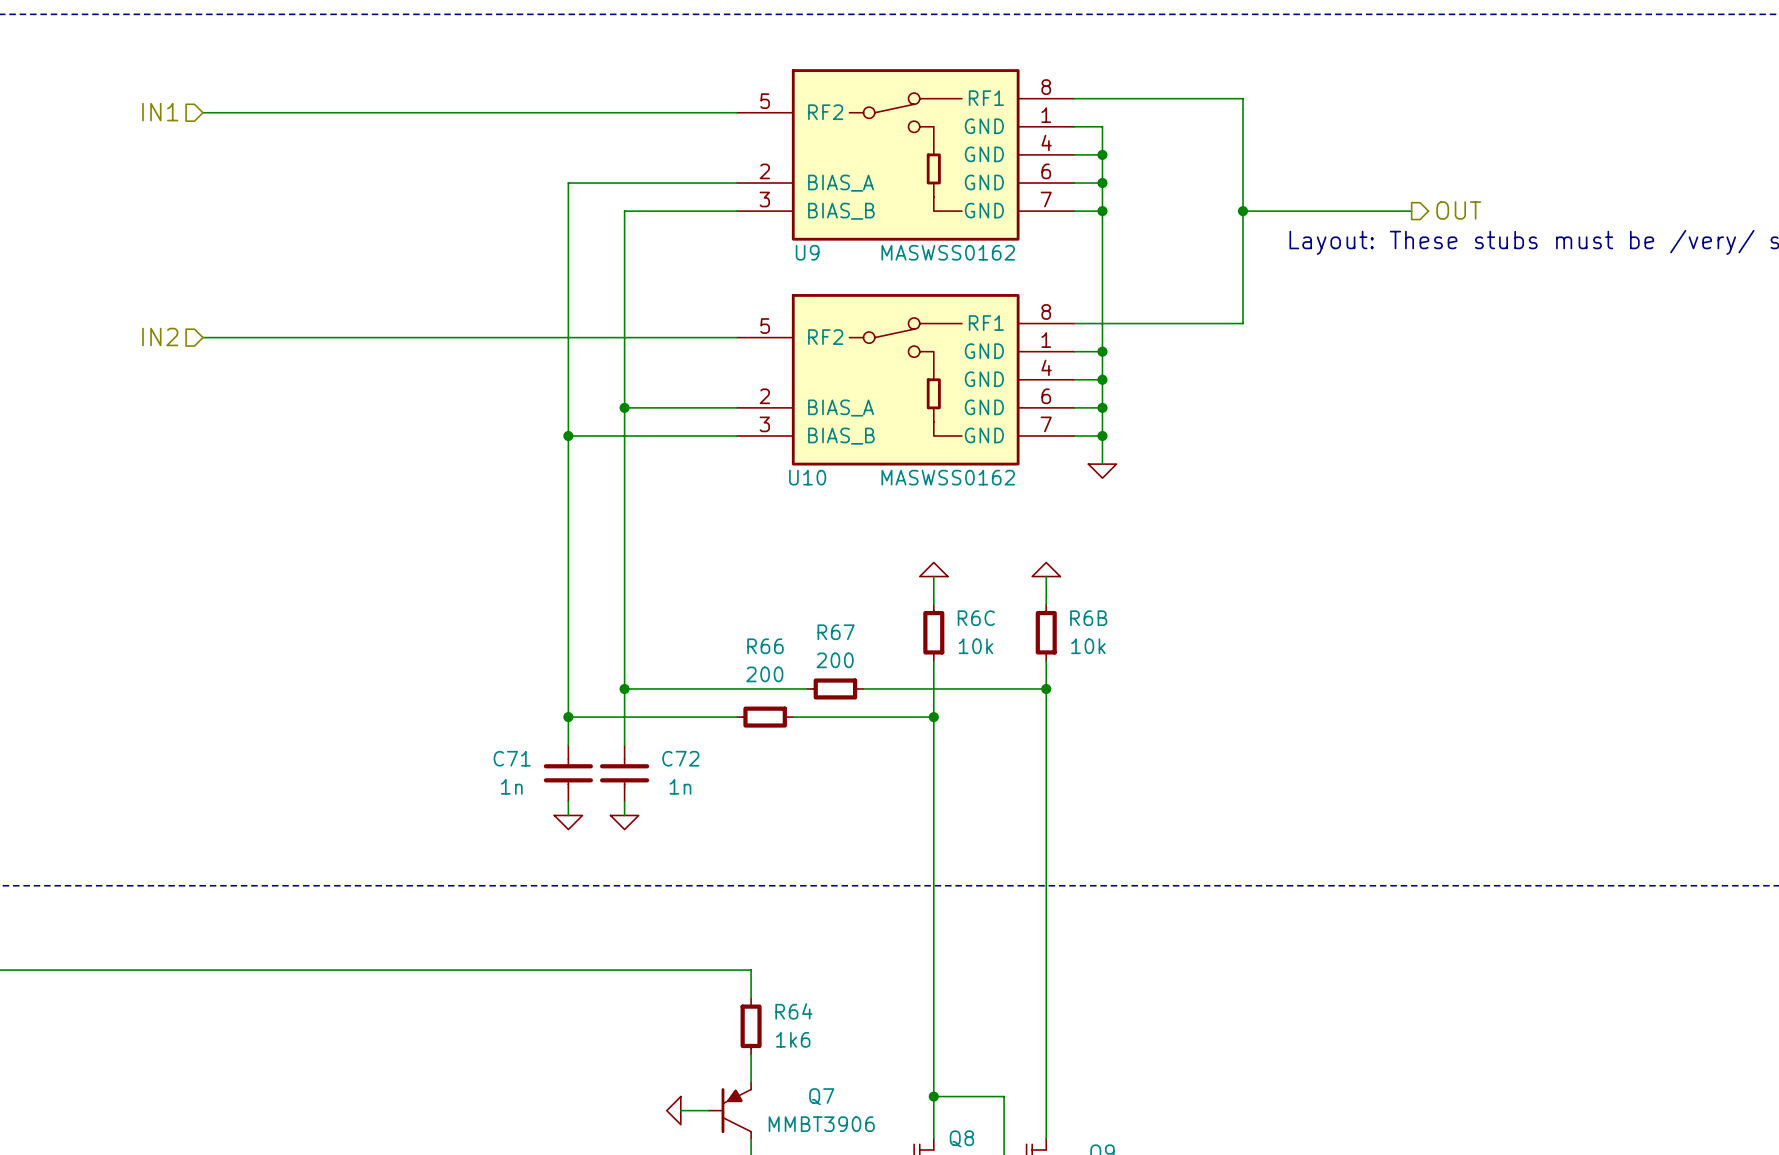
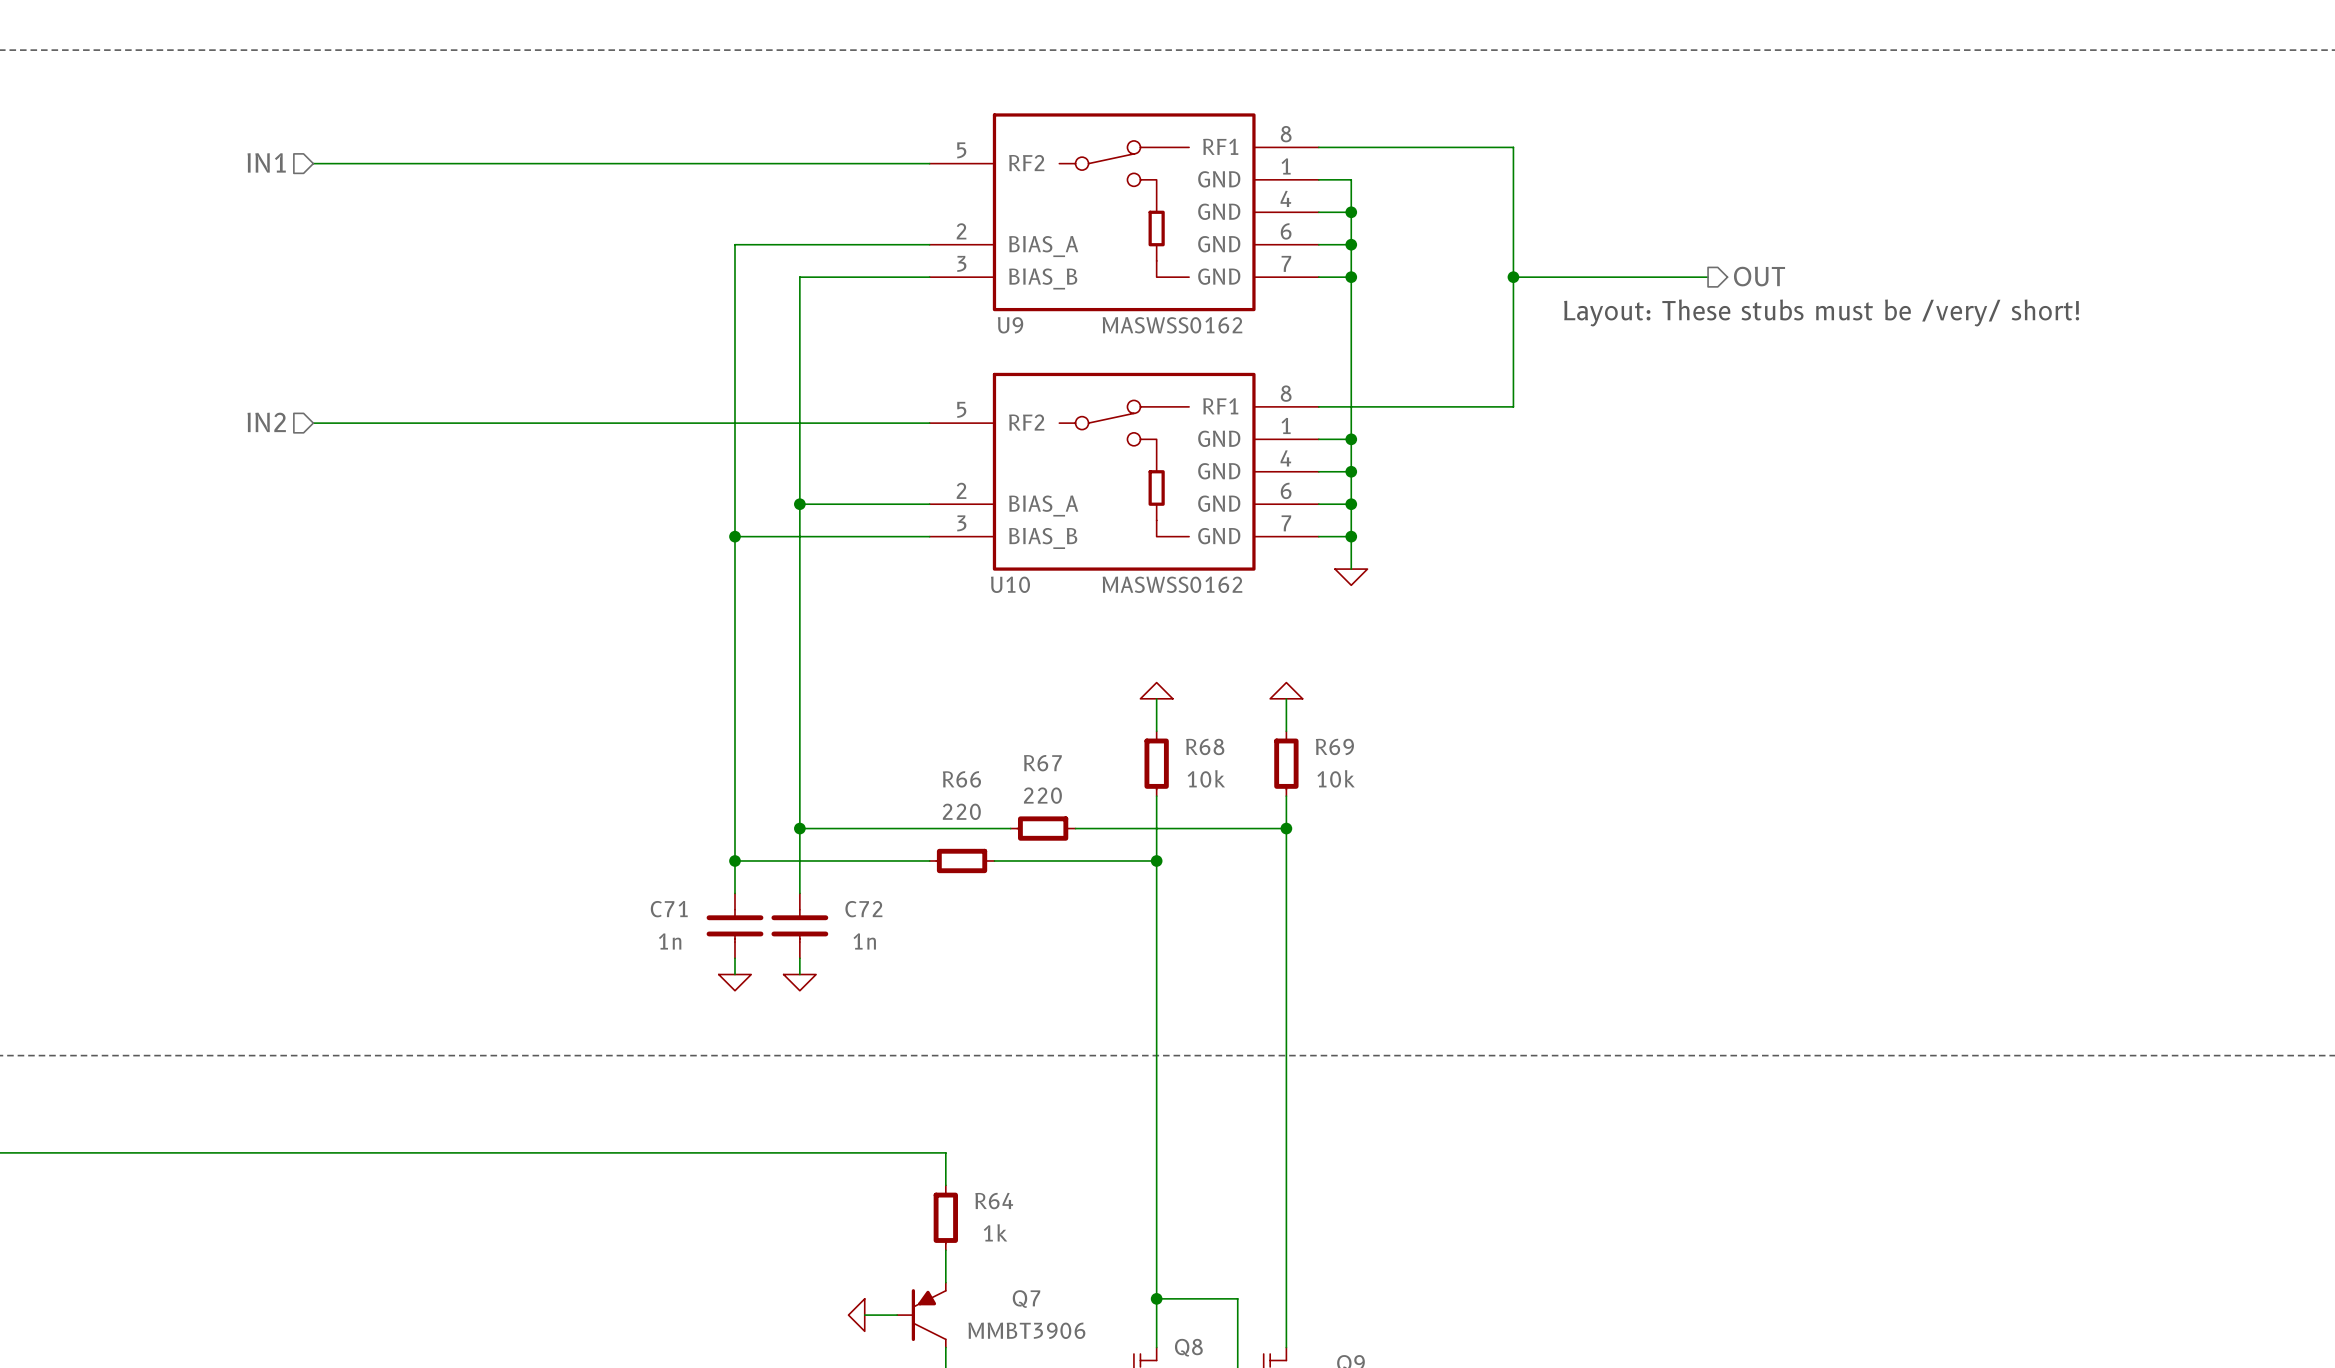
R6C: 10k (933, 632) -> none
R68: none -> 10k (1156, 763)
R6B: 10k (1046, 632) -> none
R69: none -> 10k (1286, 763)
R67 value: 200 (835, 660) -> 220 (1042, 795)
R66 value: 200 (764, 674) -> 220 (961, 811)
R64 value: 1k6 (793, 1039) -> 1k (995, 1232)

